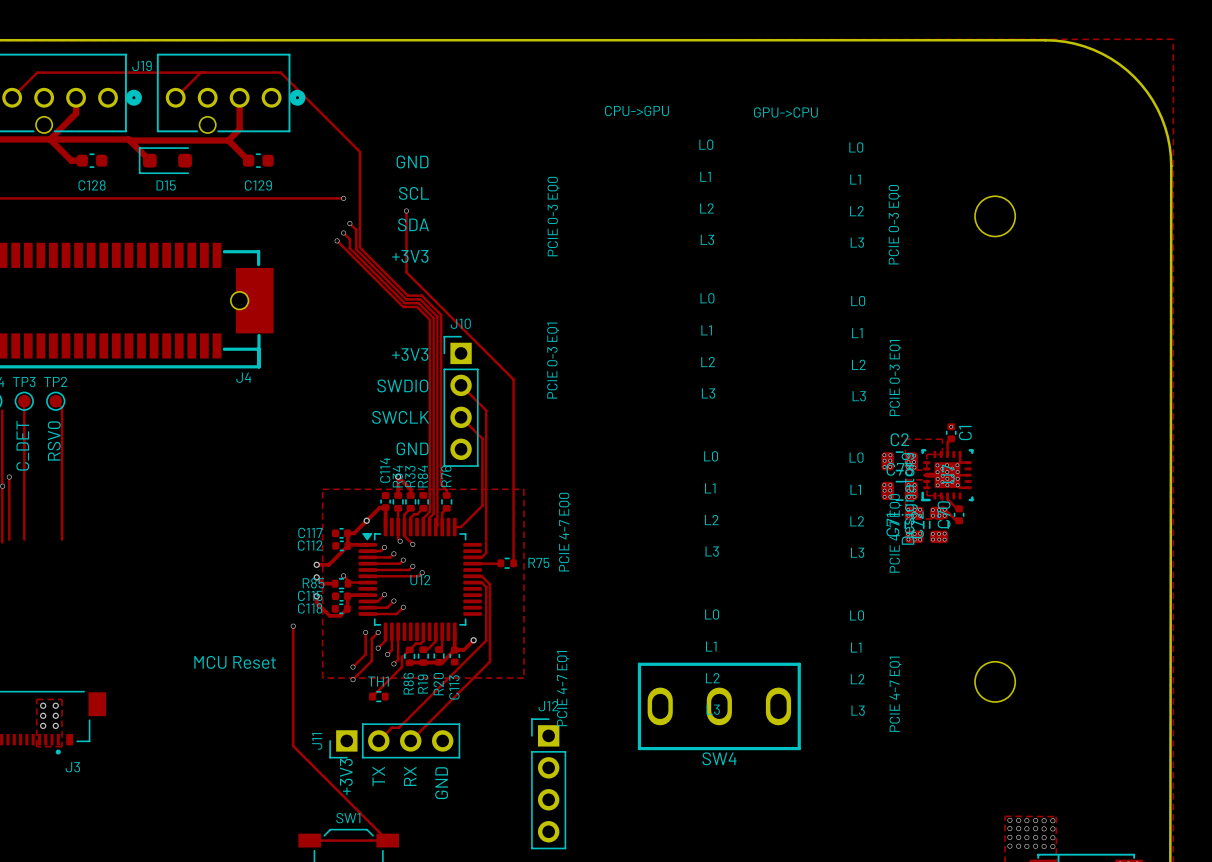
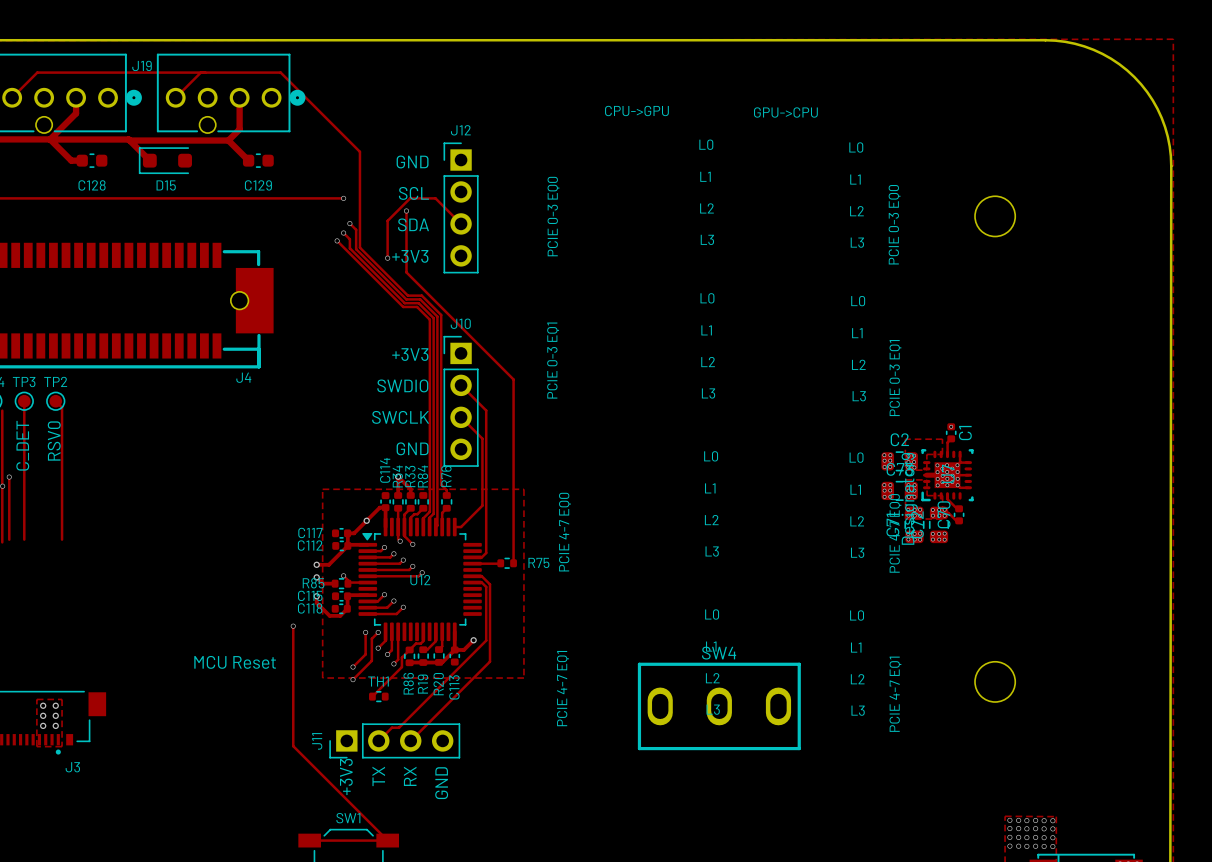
track: none -> (461, 223) (435, 198) (410, 198) (387, 220) (387, 258)
via: none -> (387, 258)
SW4 name position: SW4 (719, 758) -> SW4 (719, 653)
J12 position: (548, 783) -> (461, 207)

